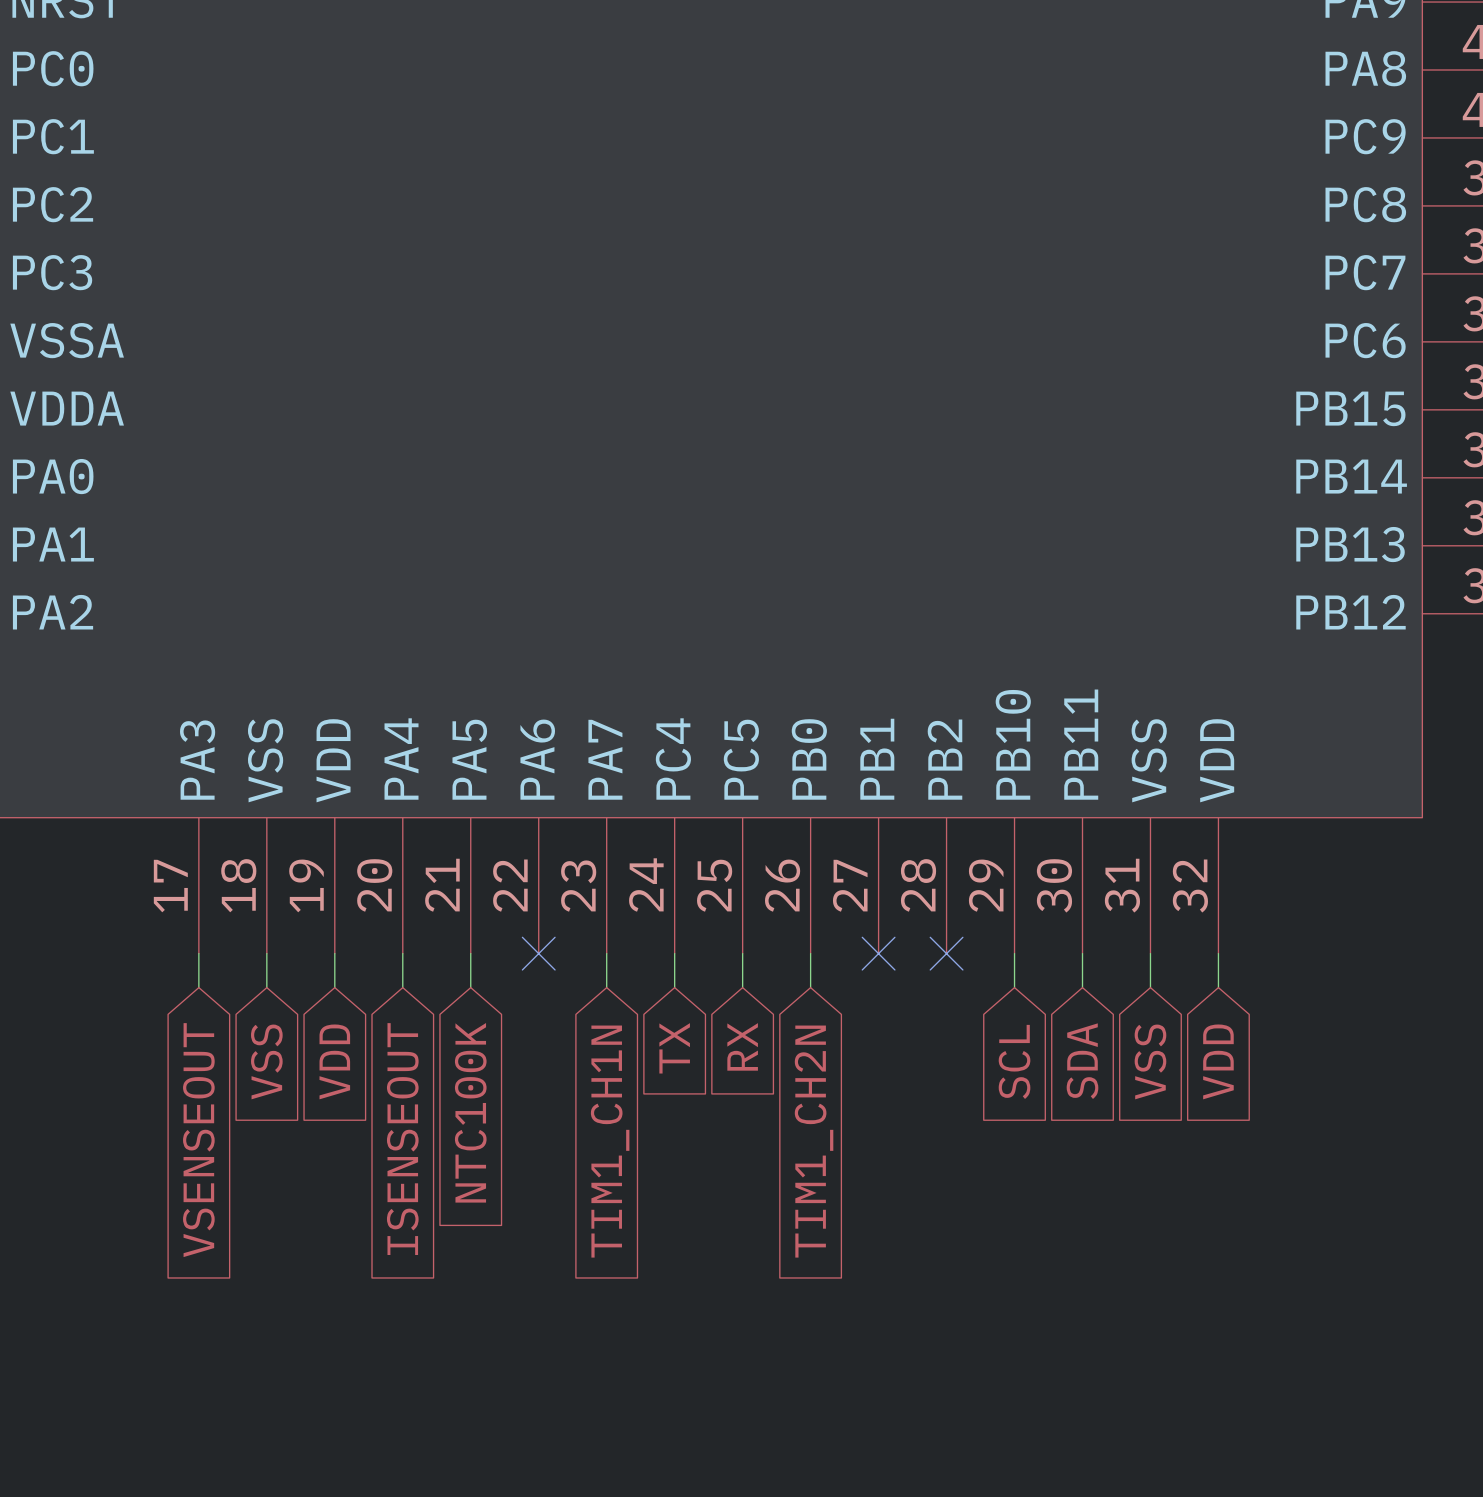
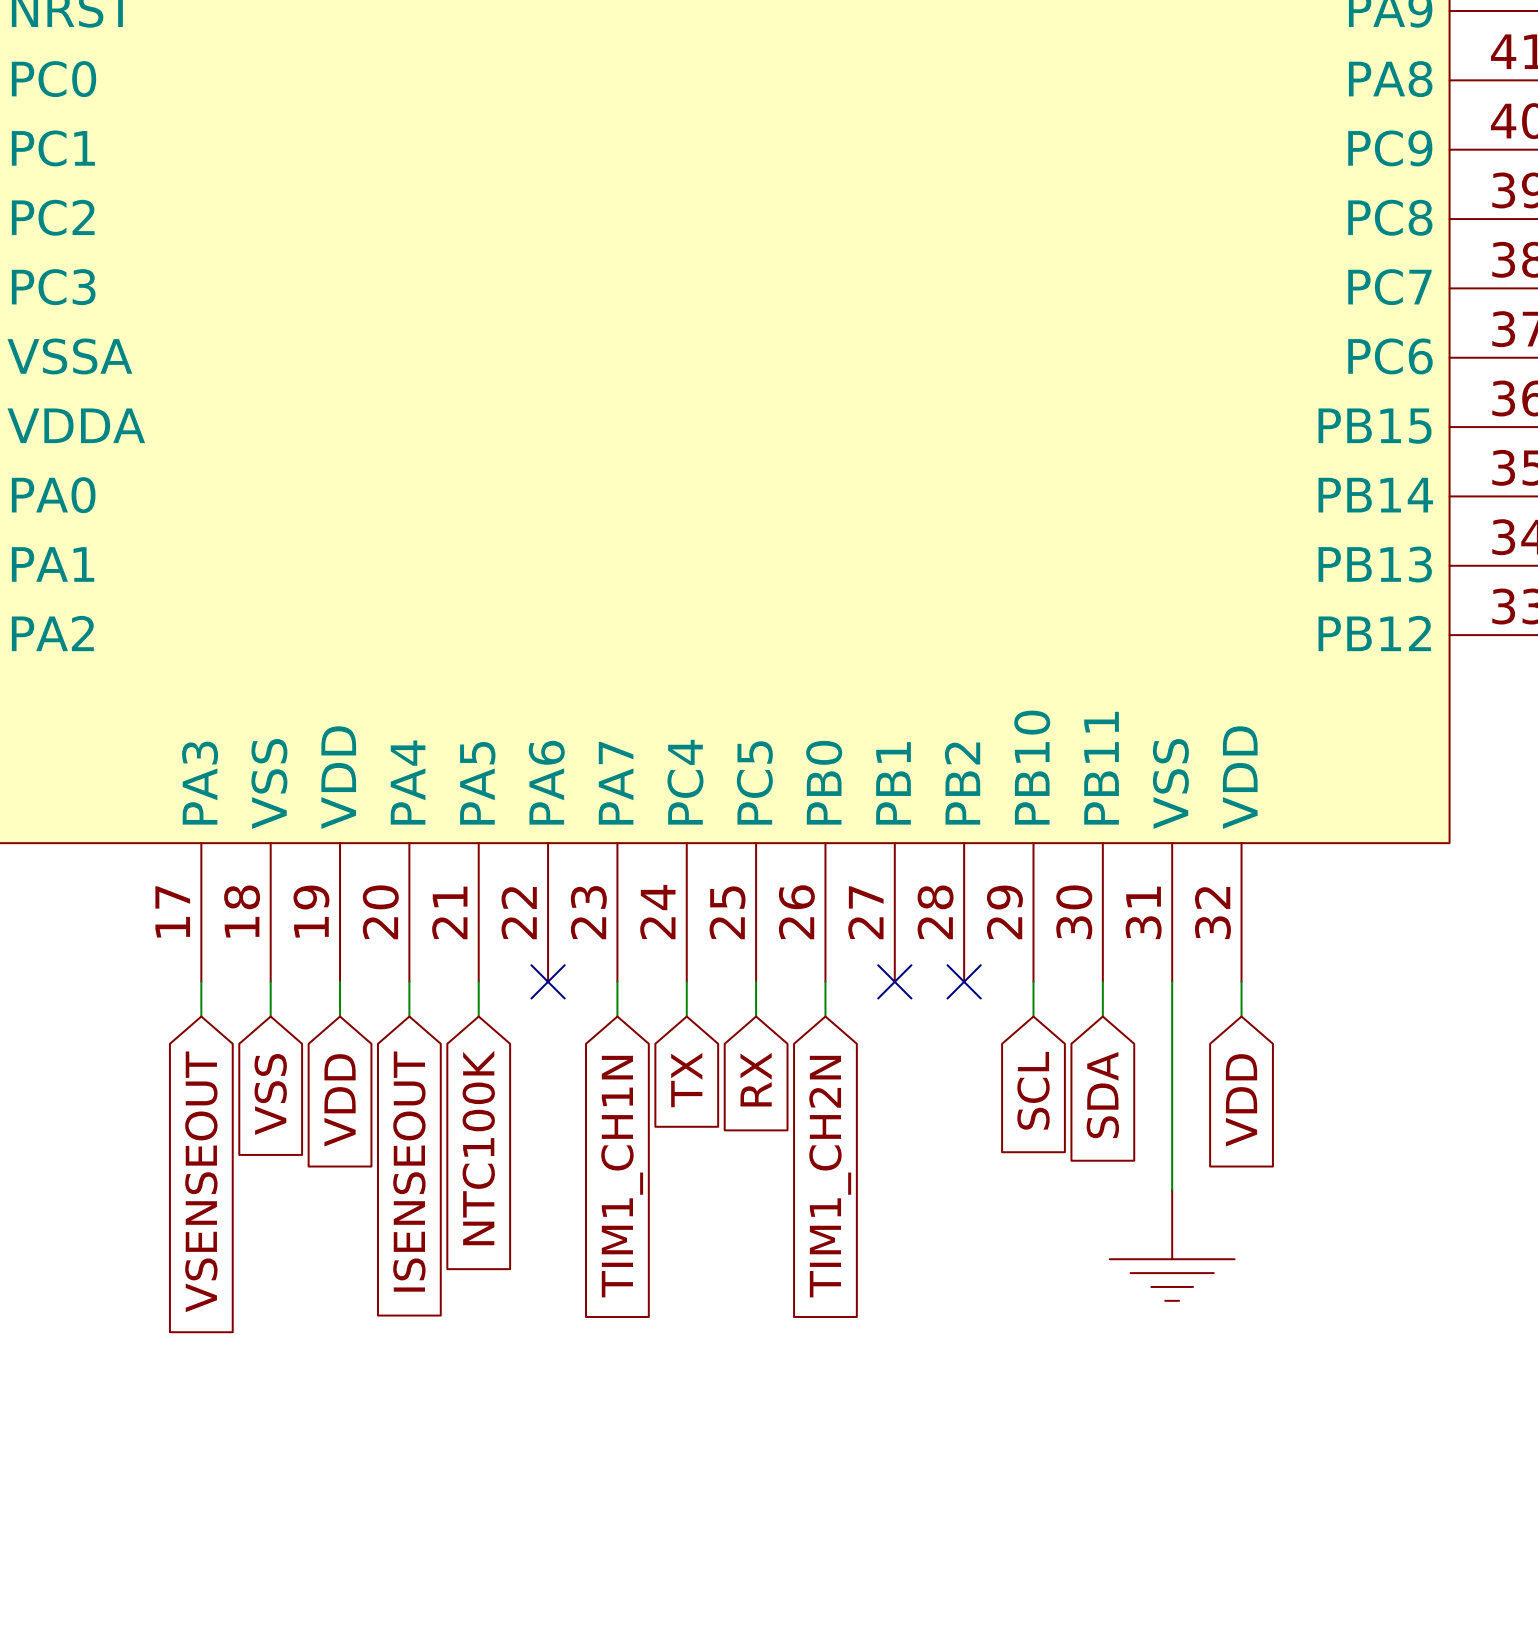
wire: none -> (1172, 1016) (1172, 1189)
global label: VSS (1150, 1061) -> none
power symbol: none -> (1172, 1245)

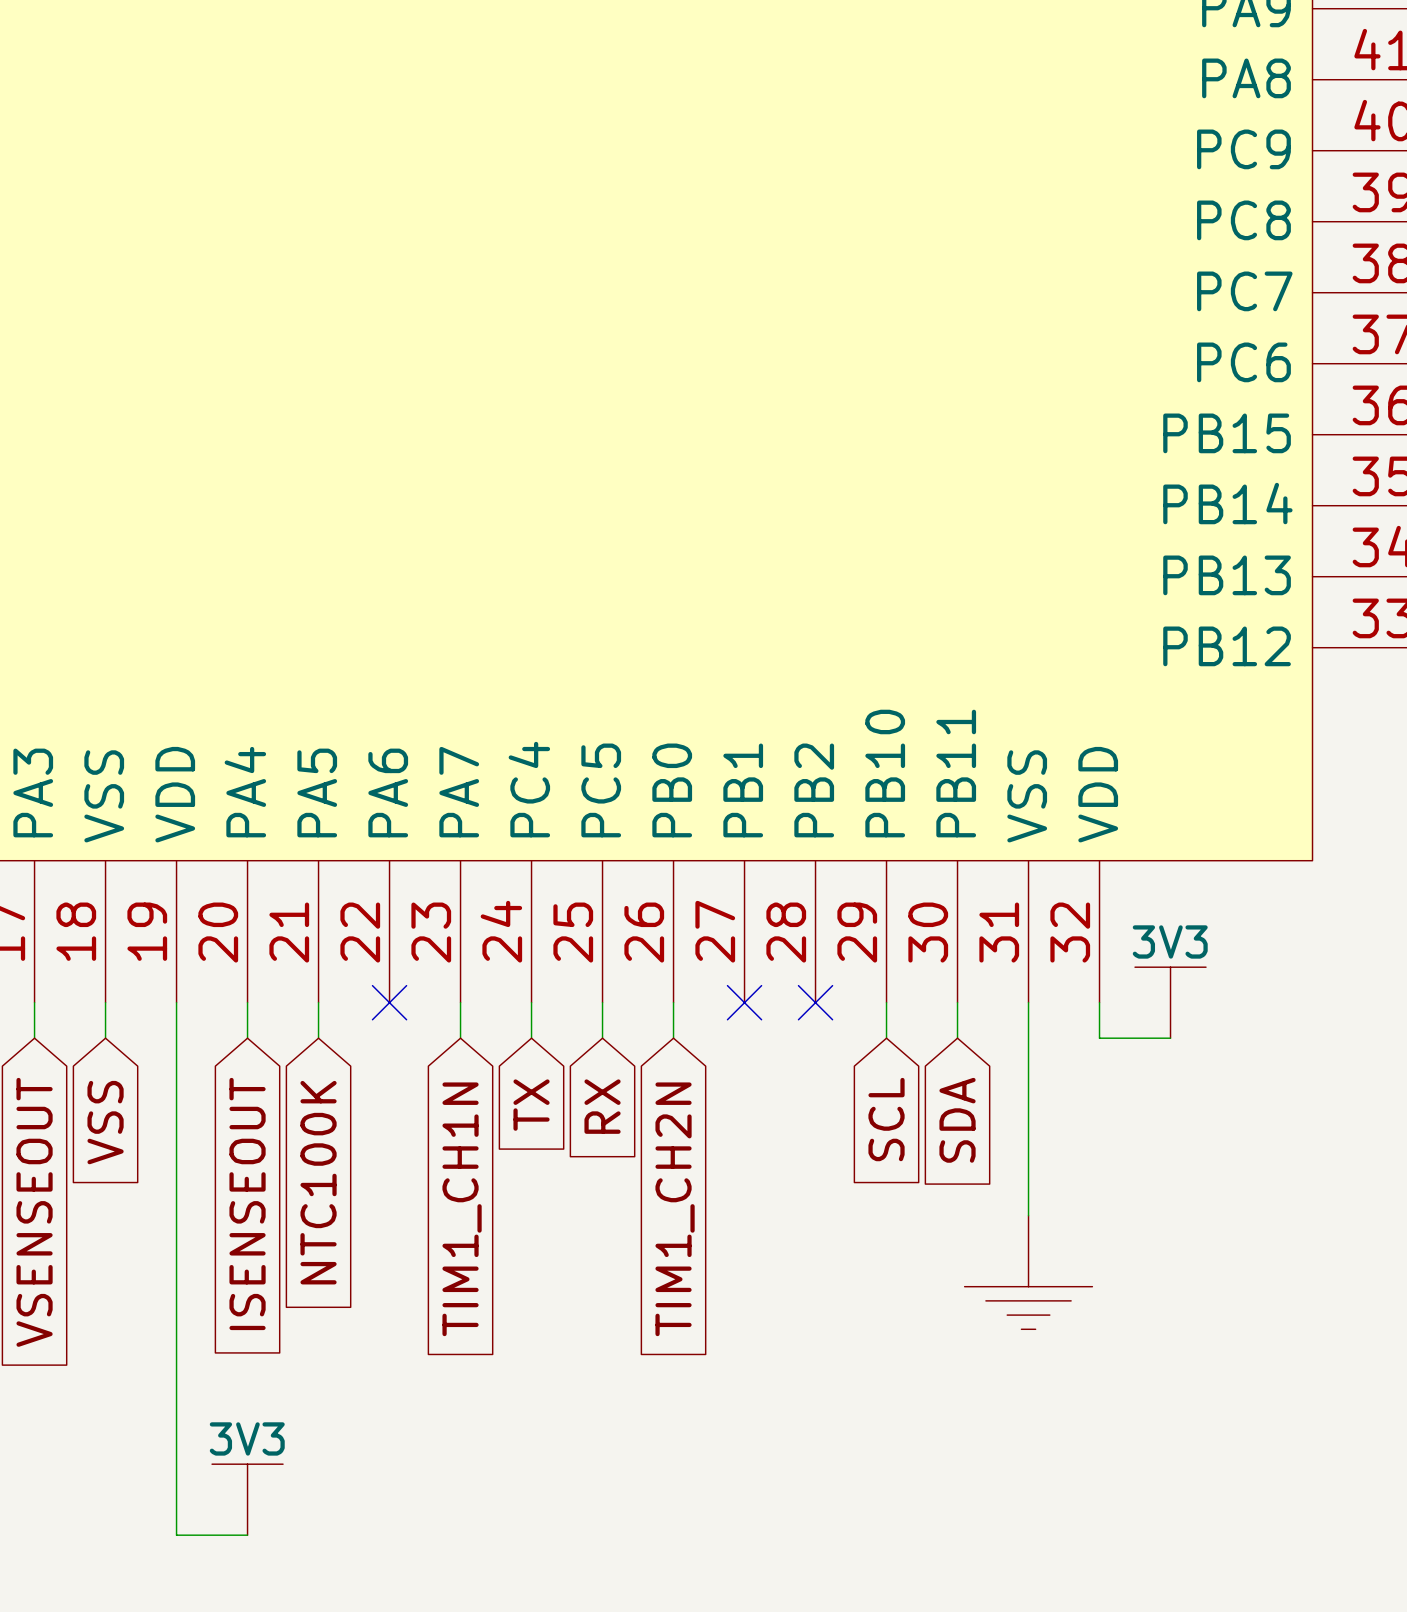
power symbol: none -> 3V3 (1170, 1002)
wire: none -> (176, 1038) (176, 1535) (247, 1535)
wire: none -> (1099, 1038) (1170, 1038)
global label: VDD (340, 1100) -> none
global label: VDD (1241, 1100) -> none
power symbol: none -> 3V3 (247, 1499)

